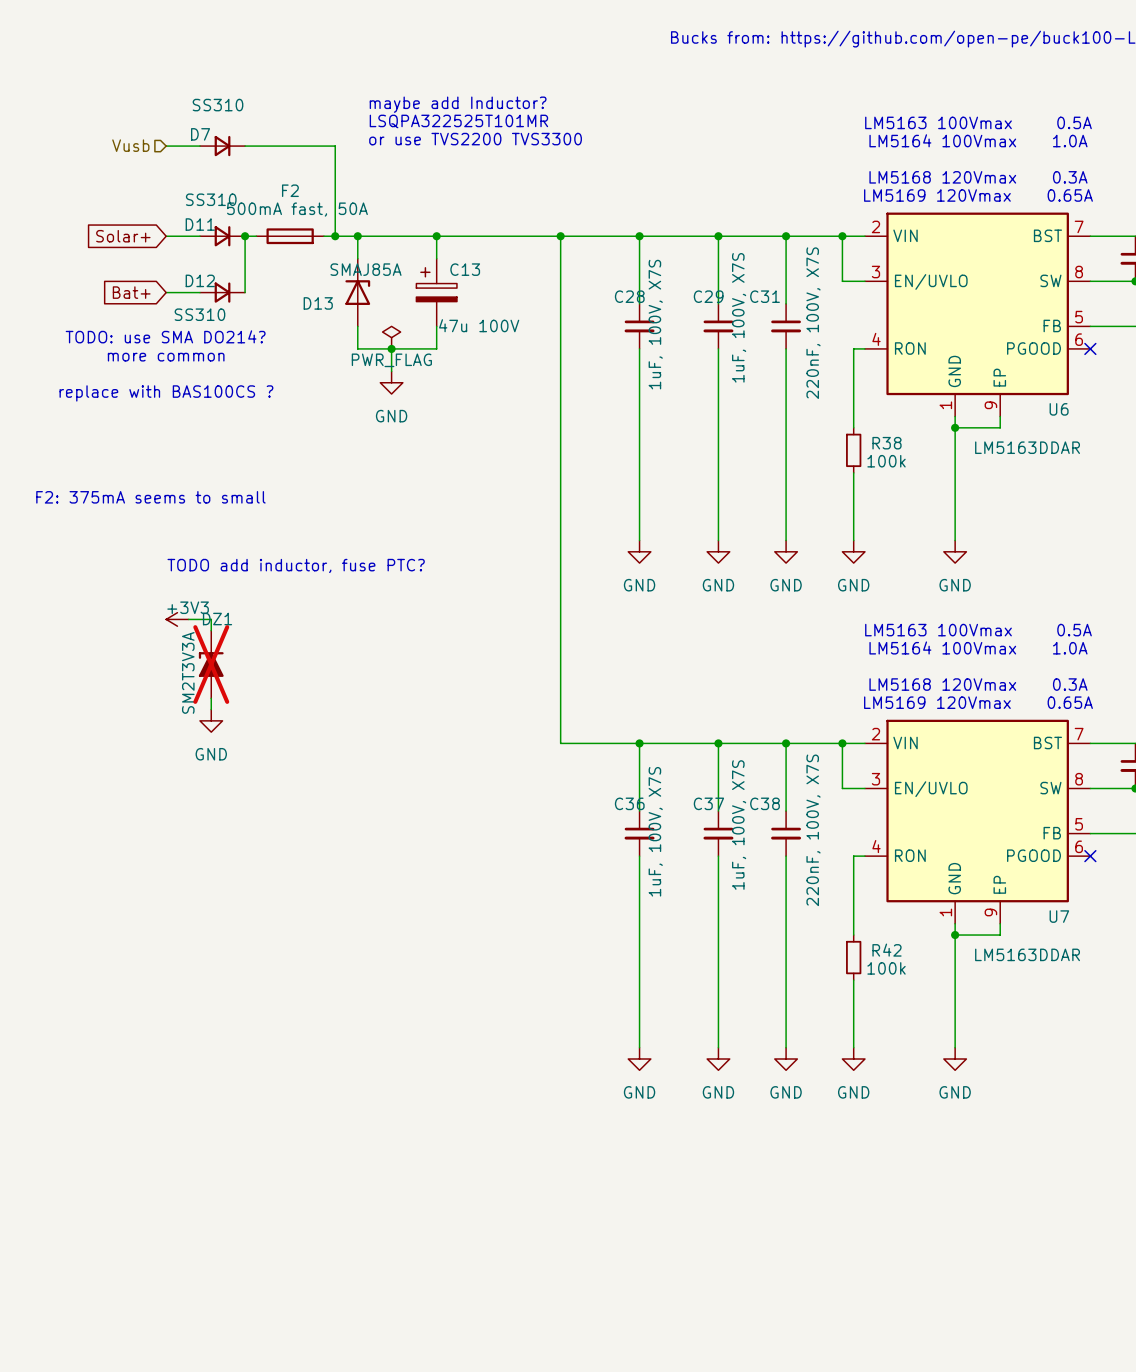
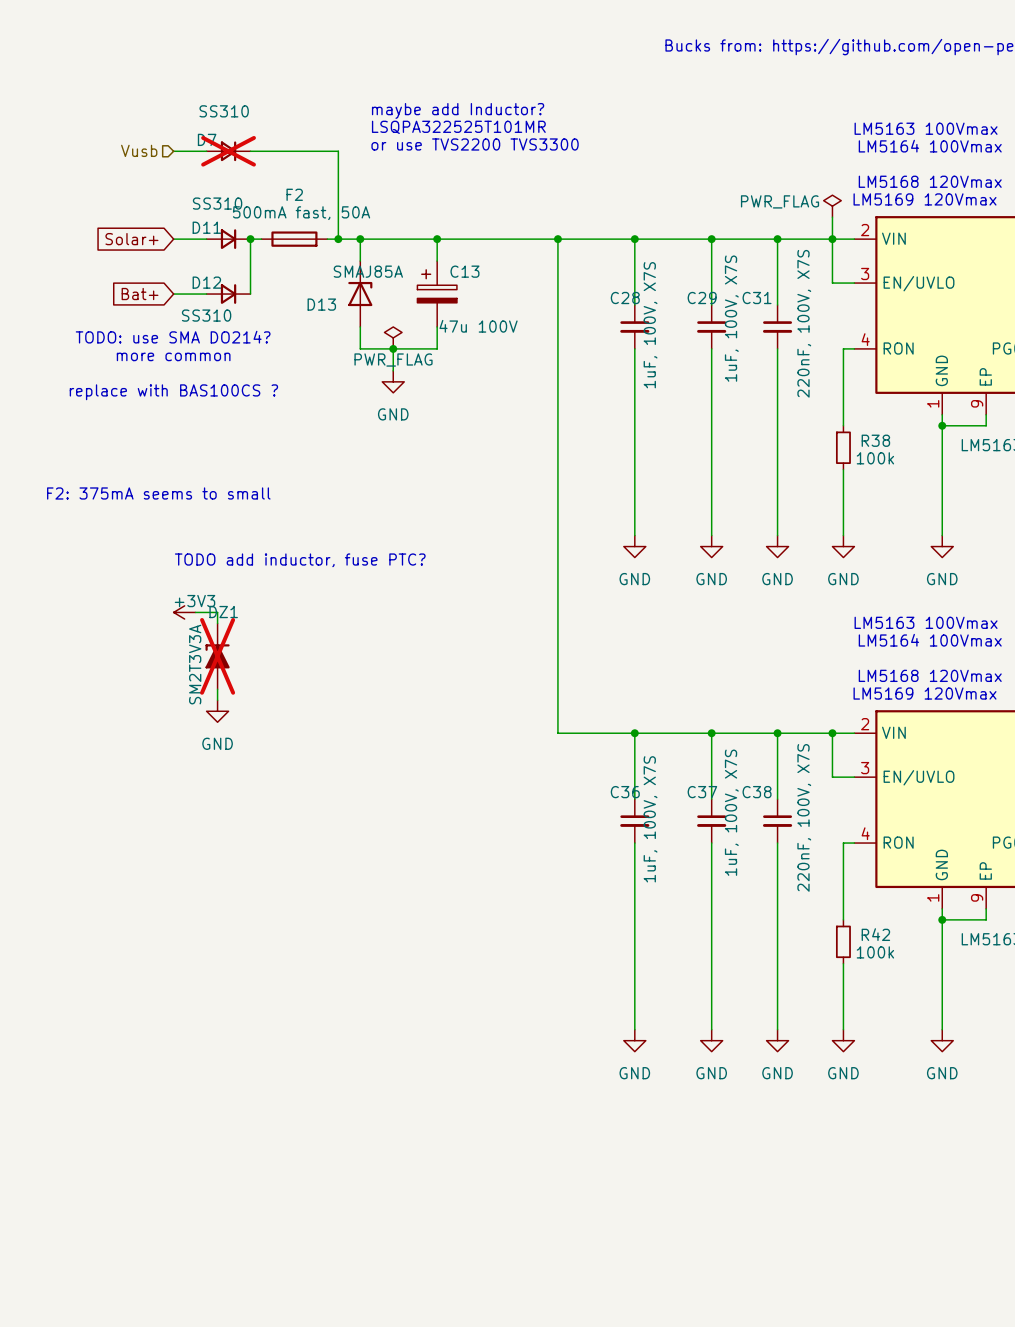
D7 do-not-place cross: none -> (228, 151)
power symbol: none -> PWR_FLAG (832, 206)
wire: none -> (832, 217) (832, 239)

